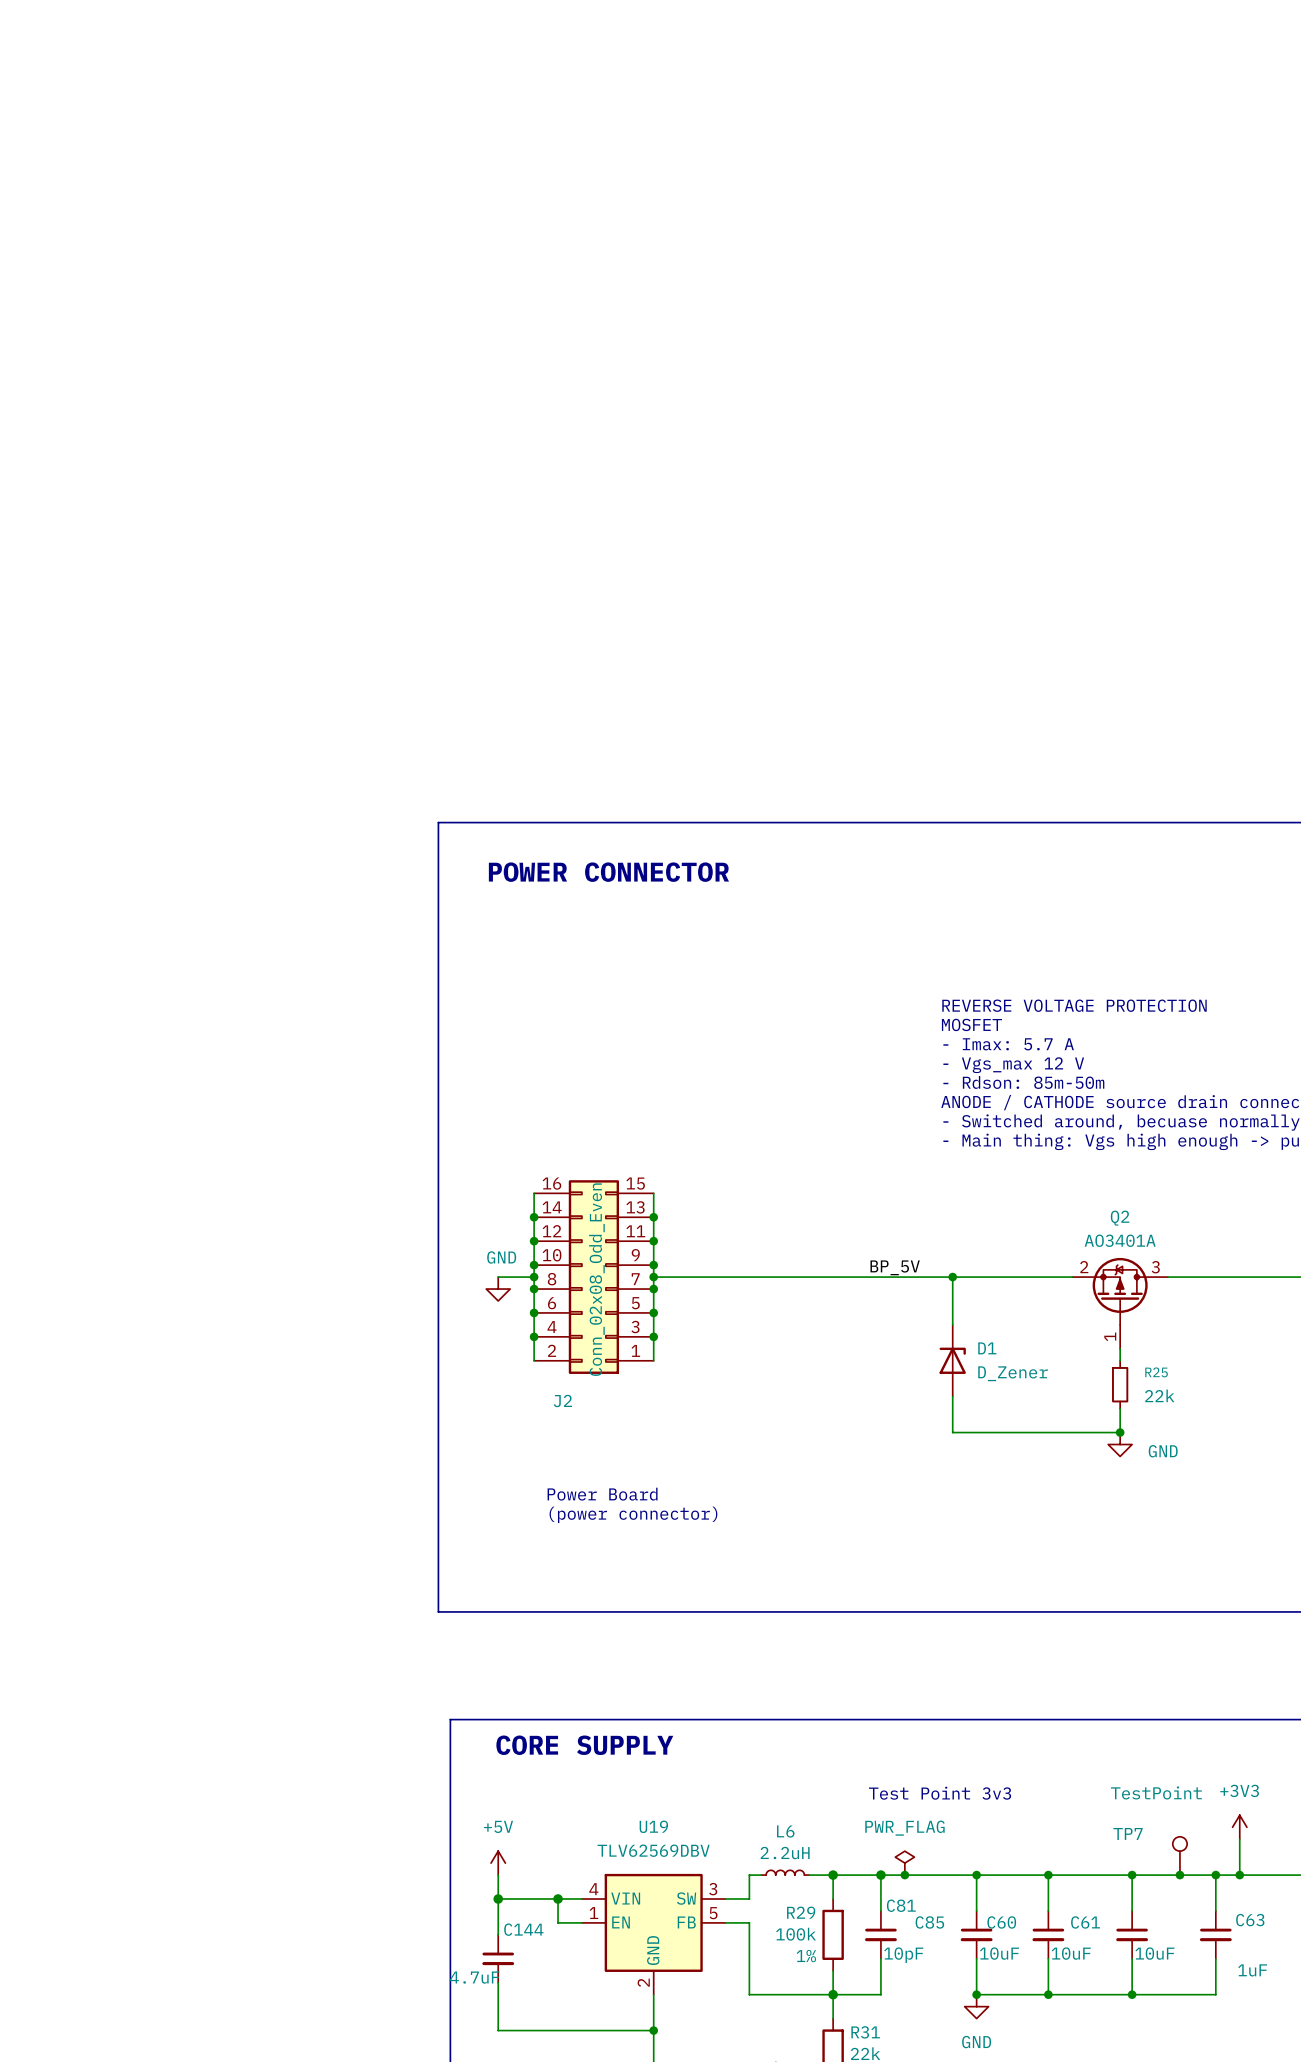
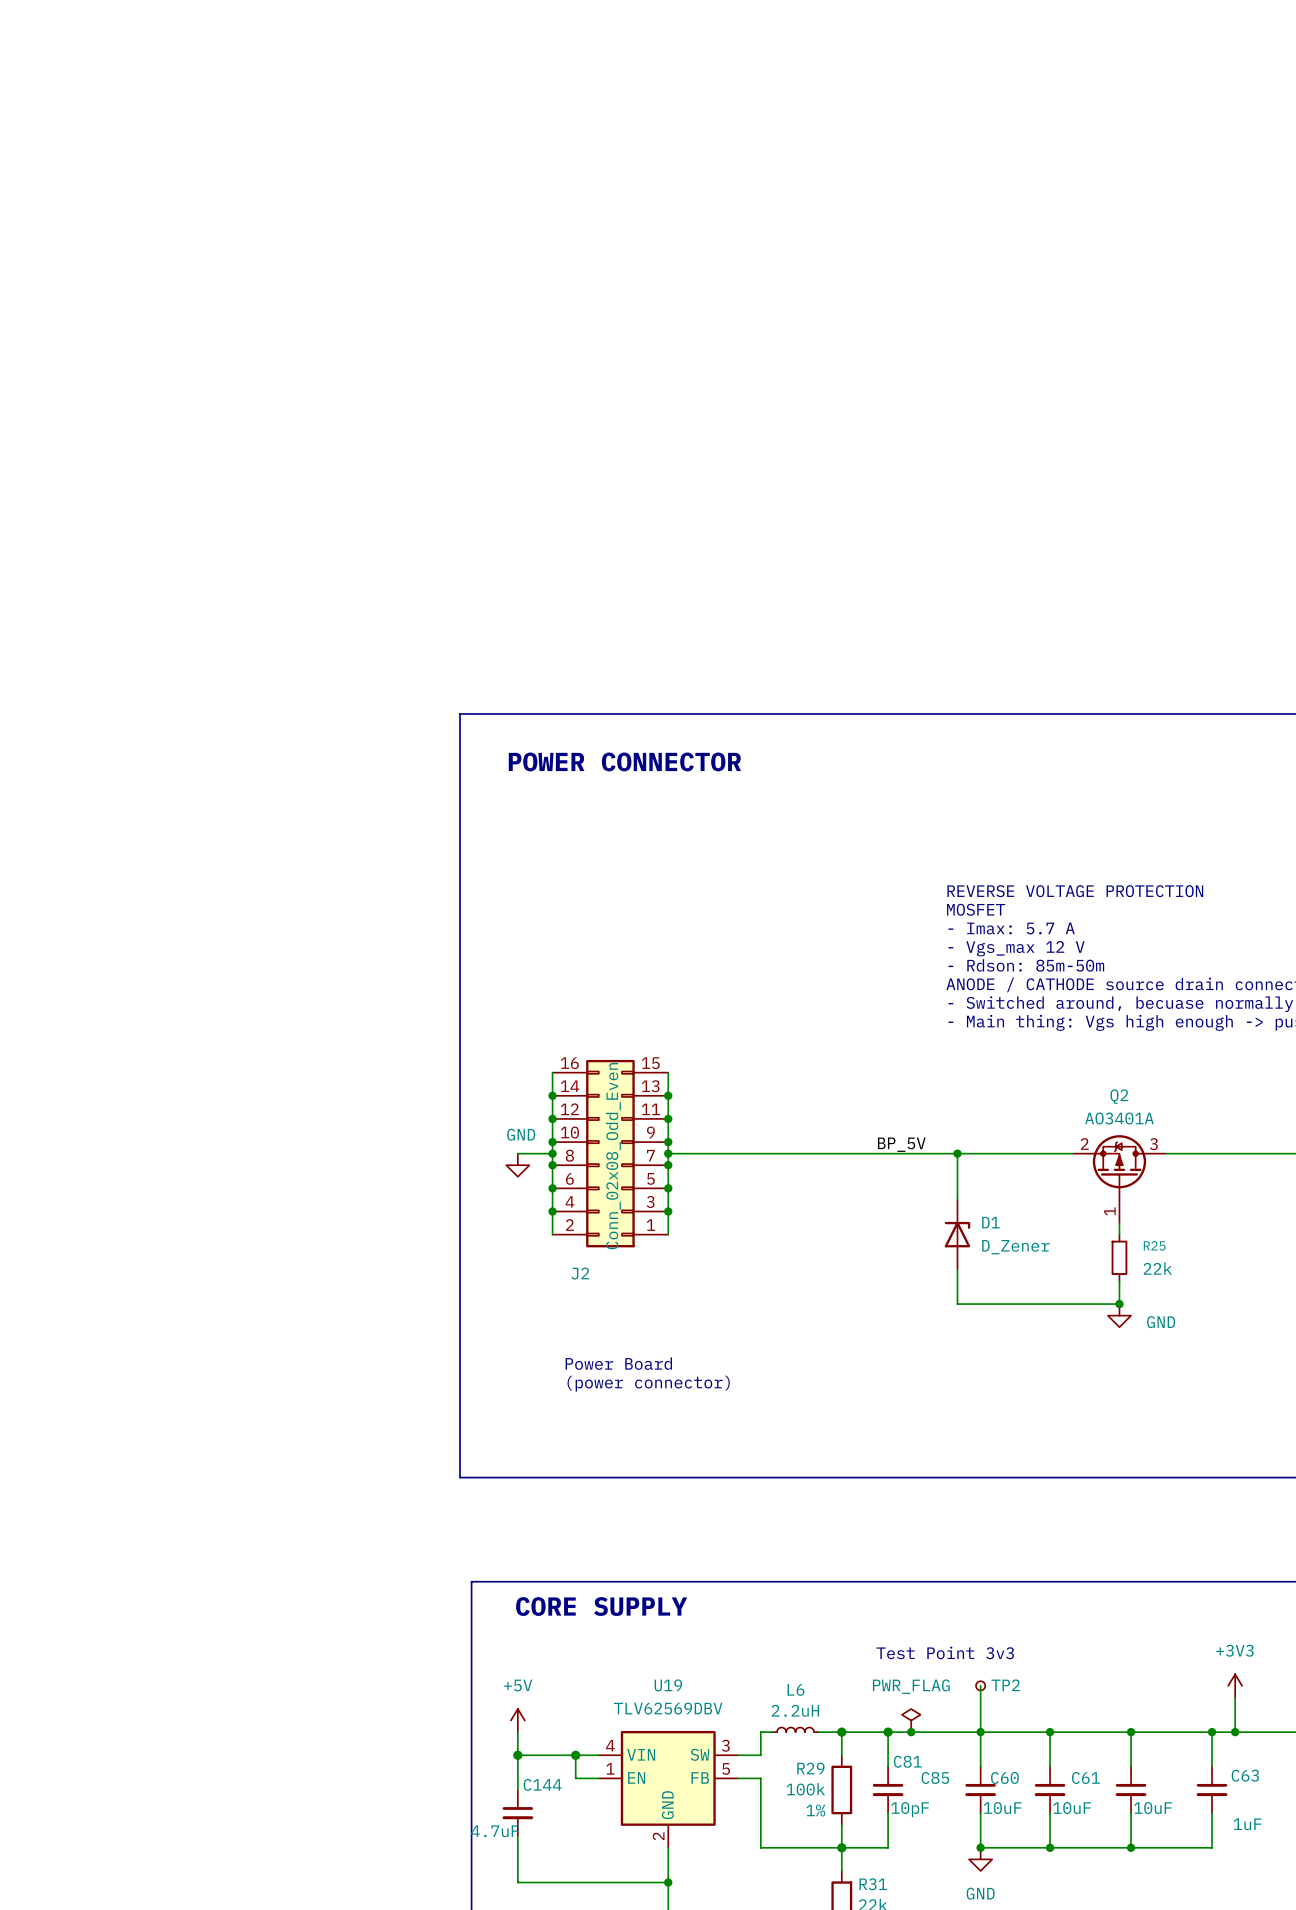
wire: none -> (980, 1685) (980, 1732)
TP2: none -> (980, 1685)
TP7: TestPoint (1179, 1855) -> none
junction: (1179, 1875) -> none

